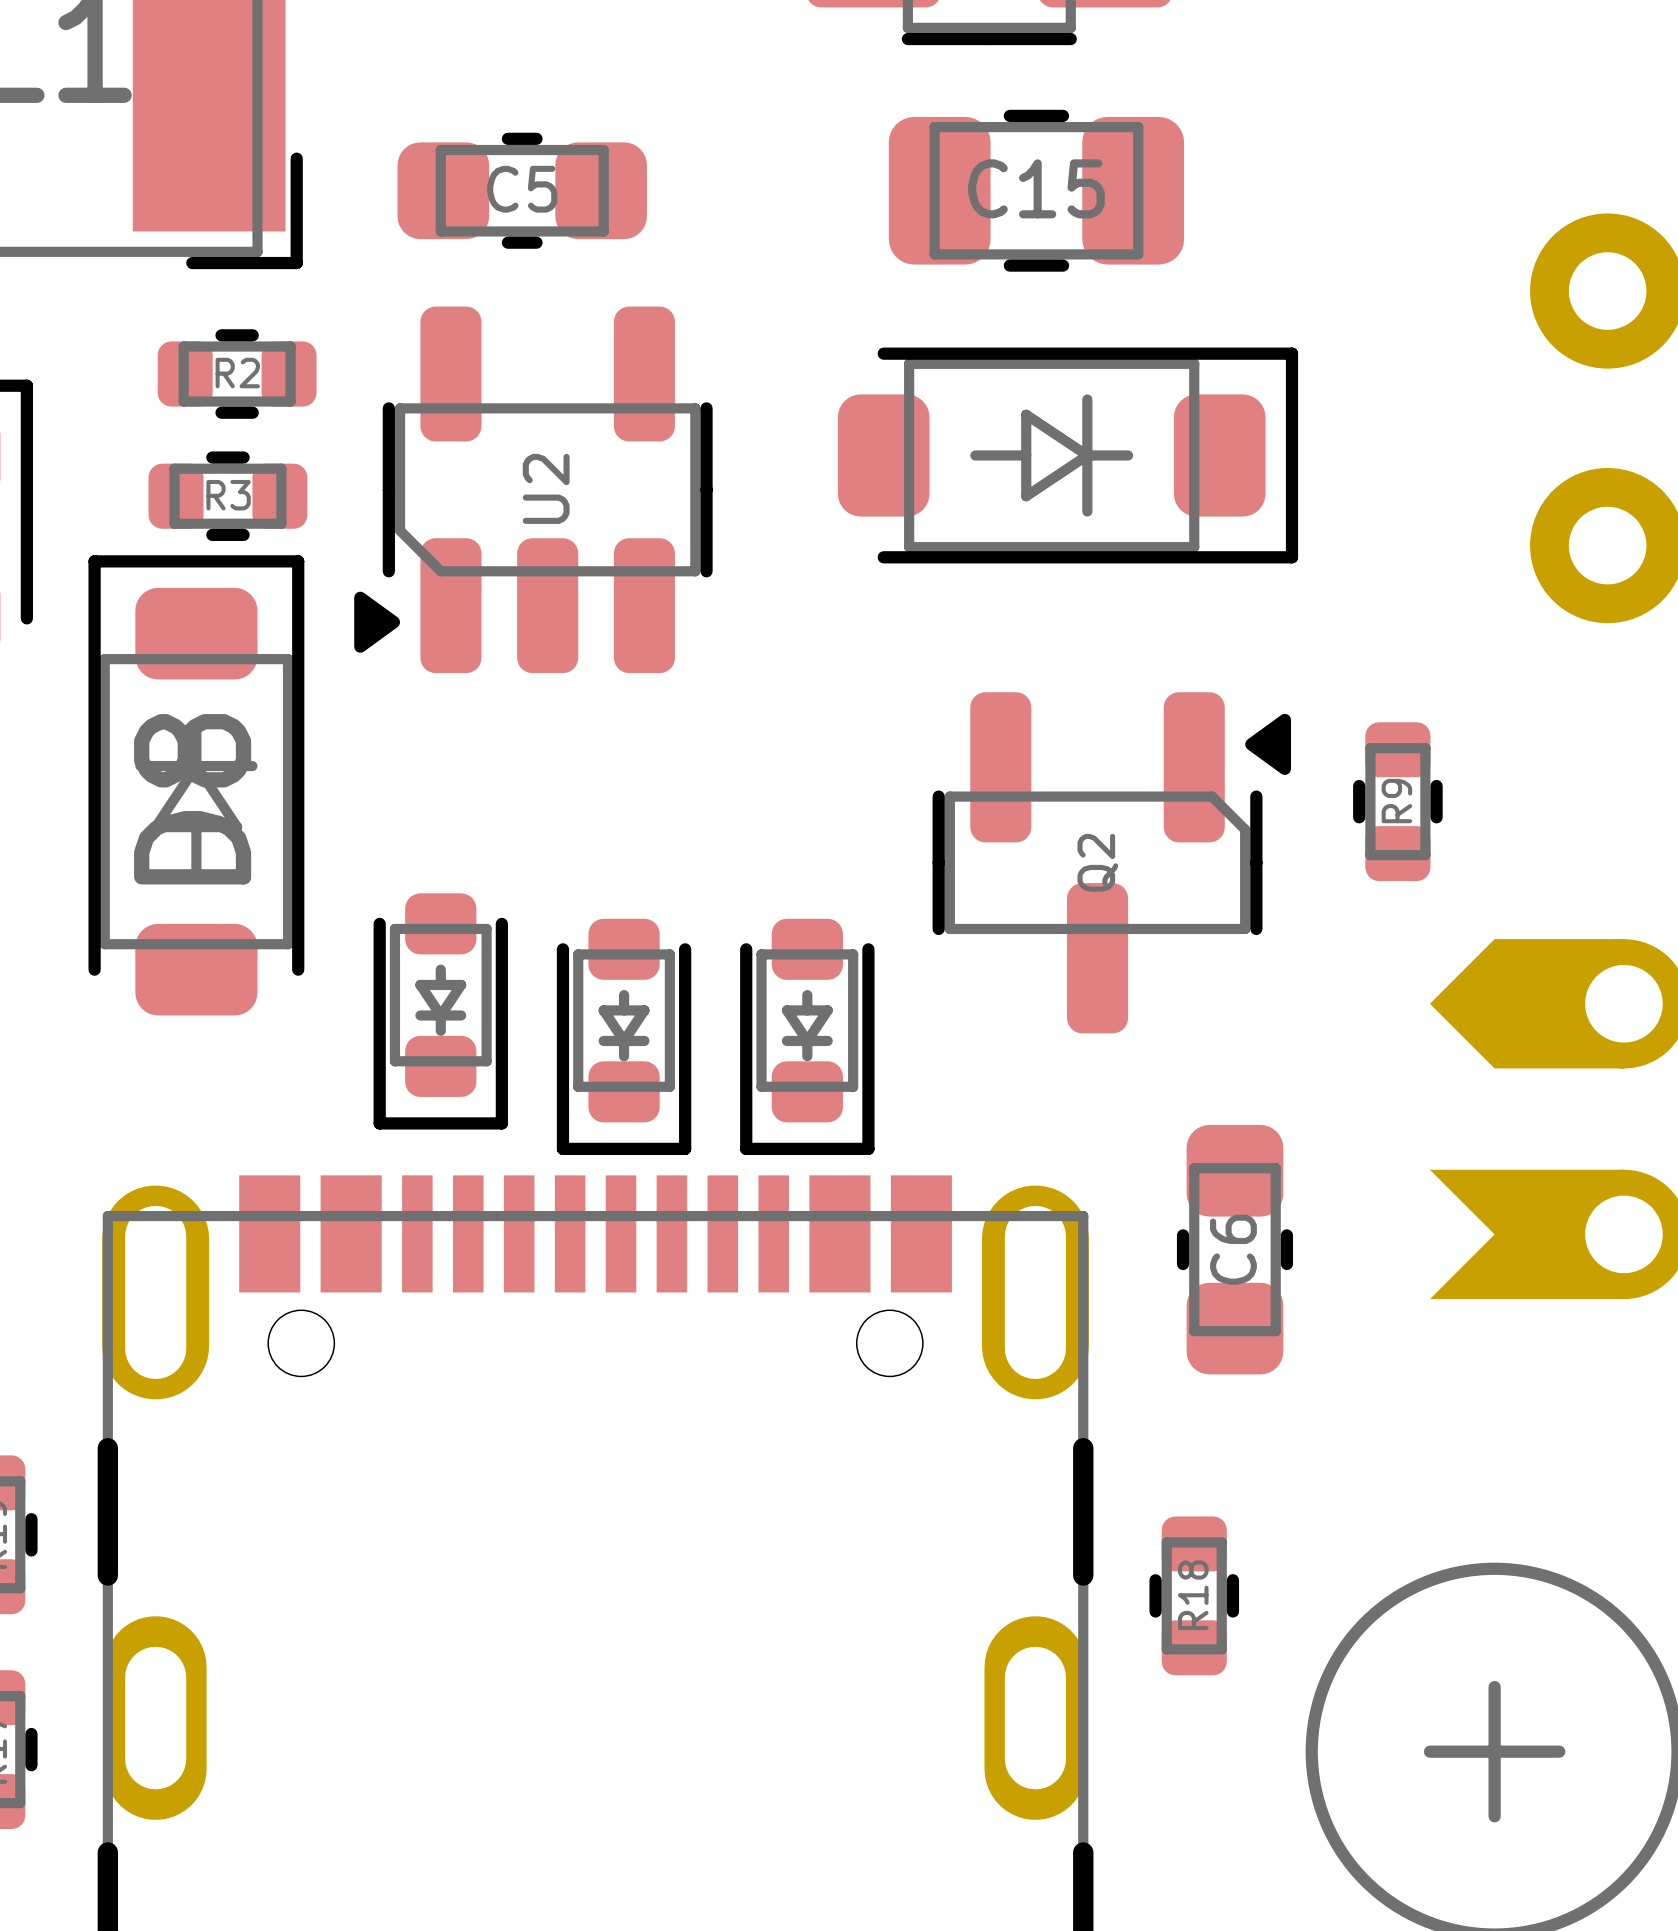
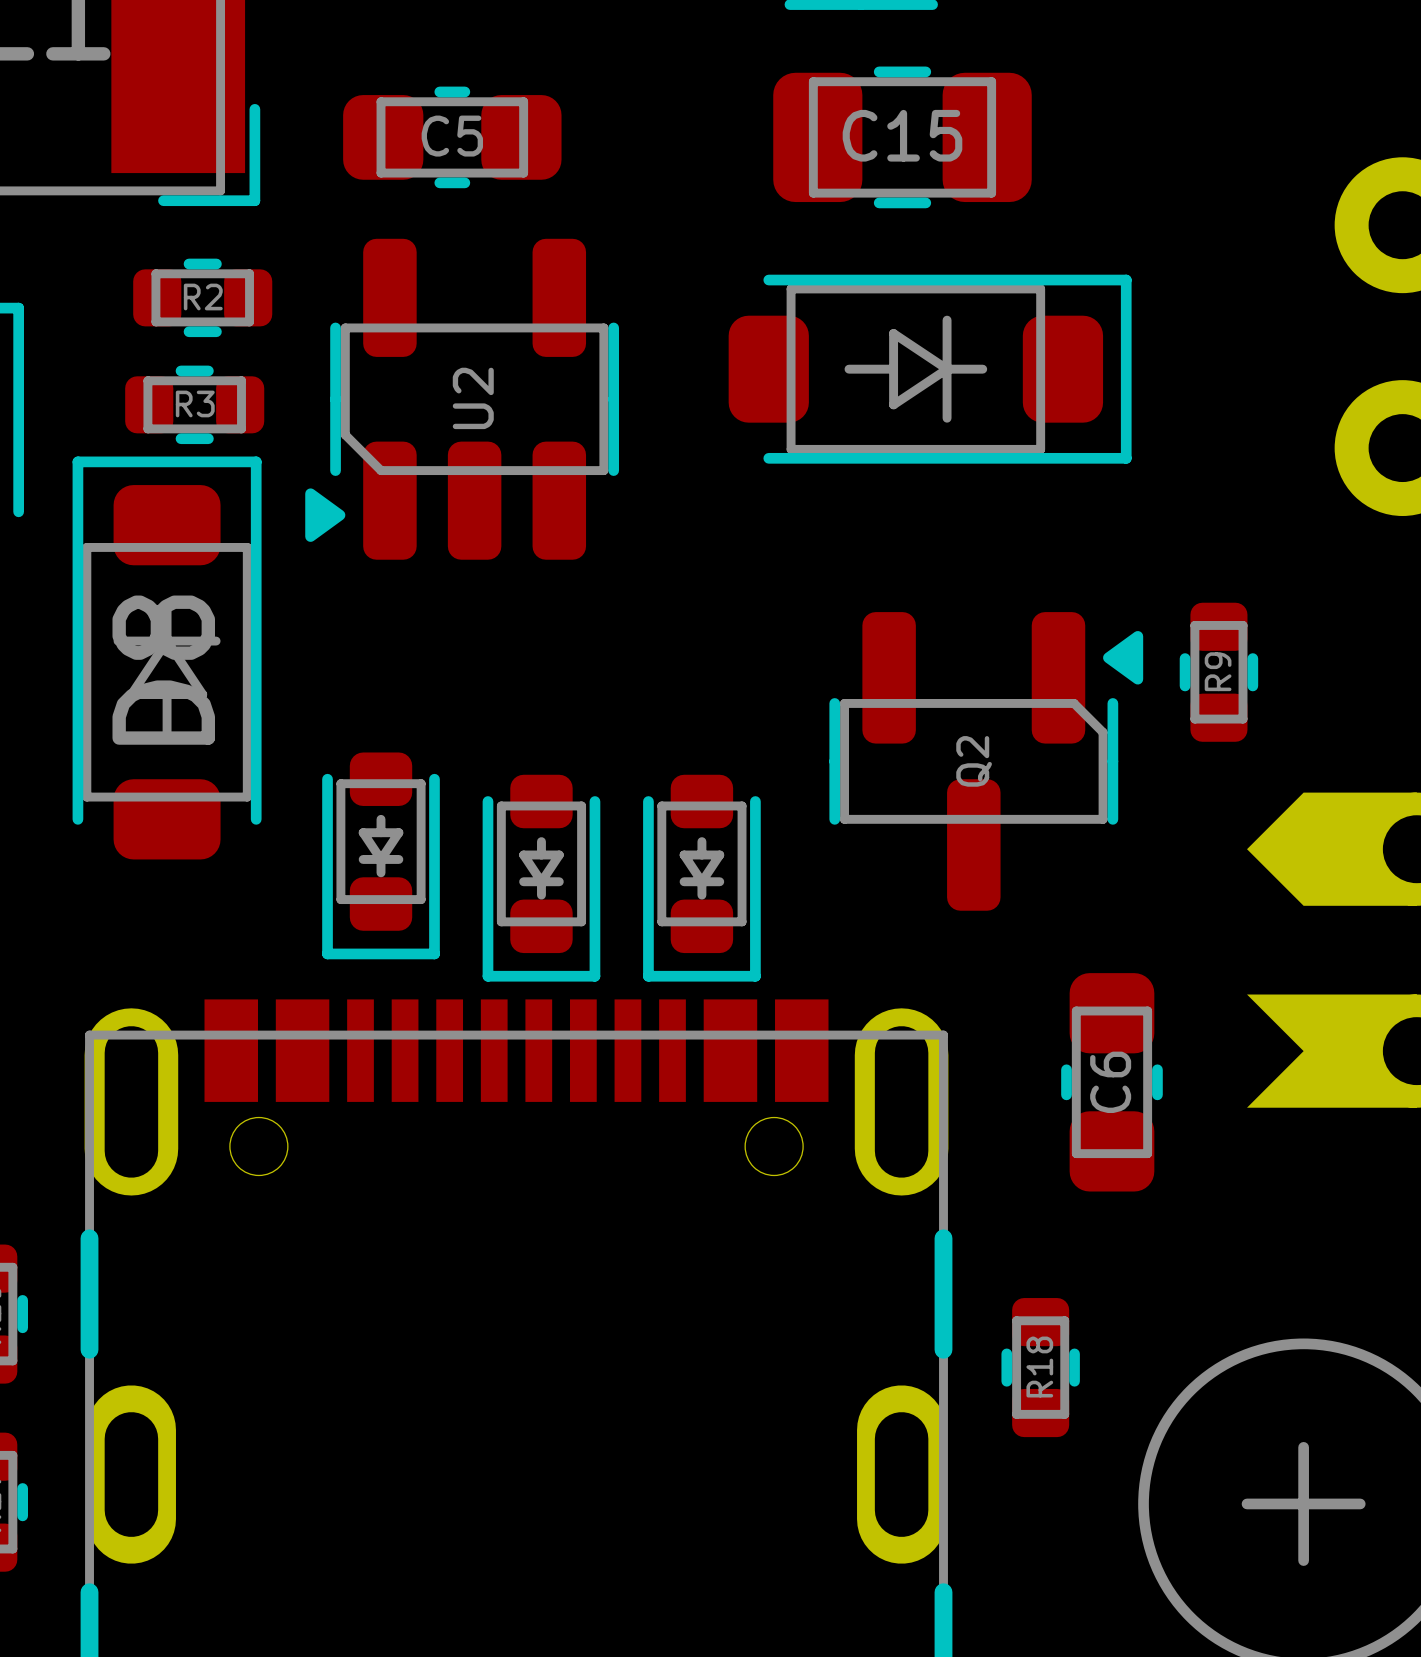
Q2 position: (1111, 862) -> (986, 761)
C6 position: (1234, 1249) -> (1111, 1082)

